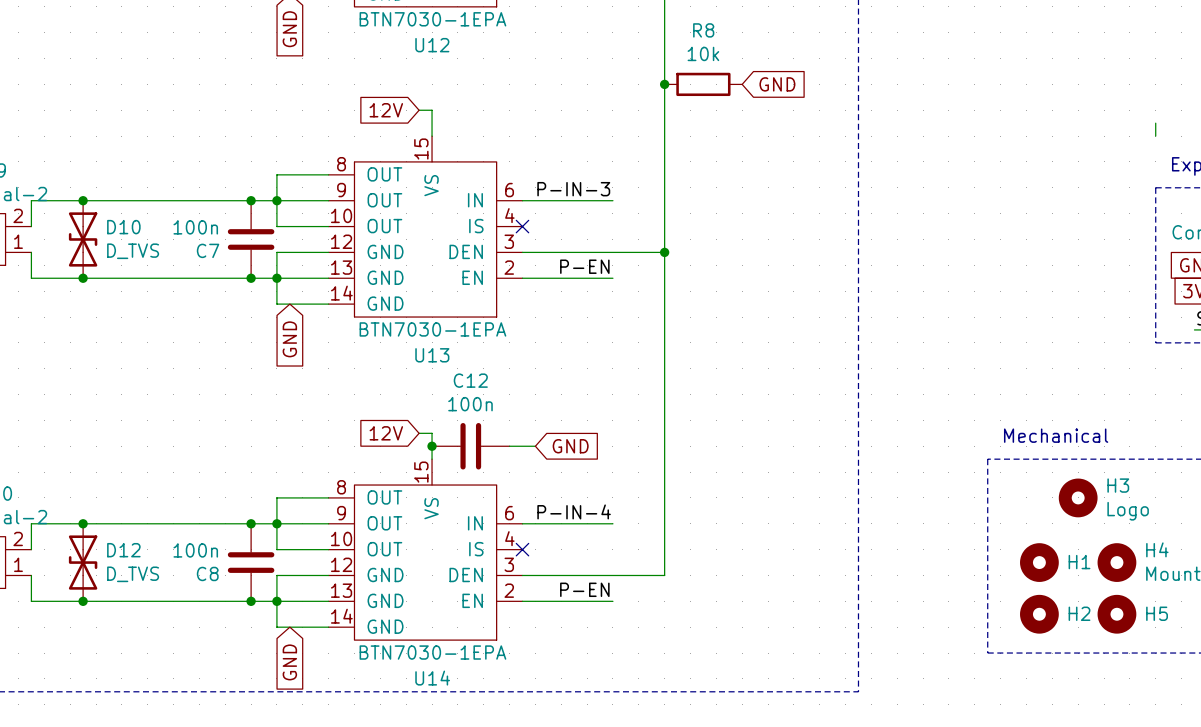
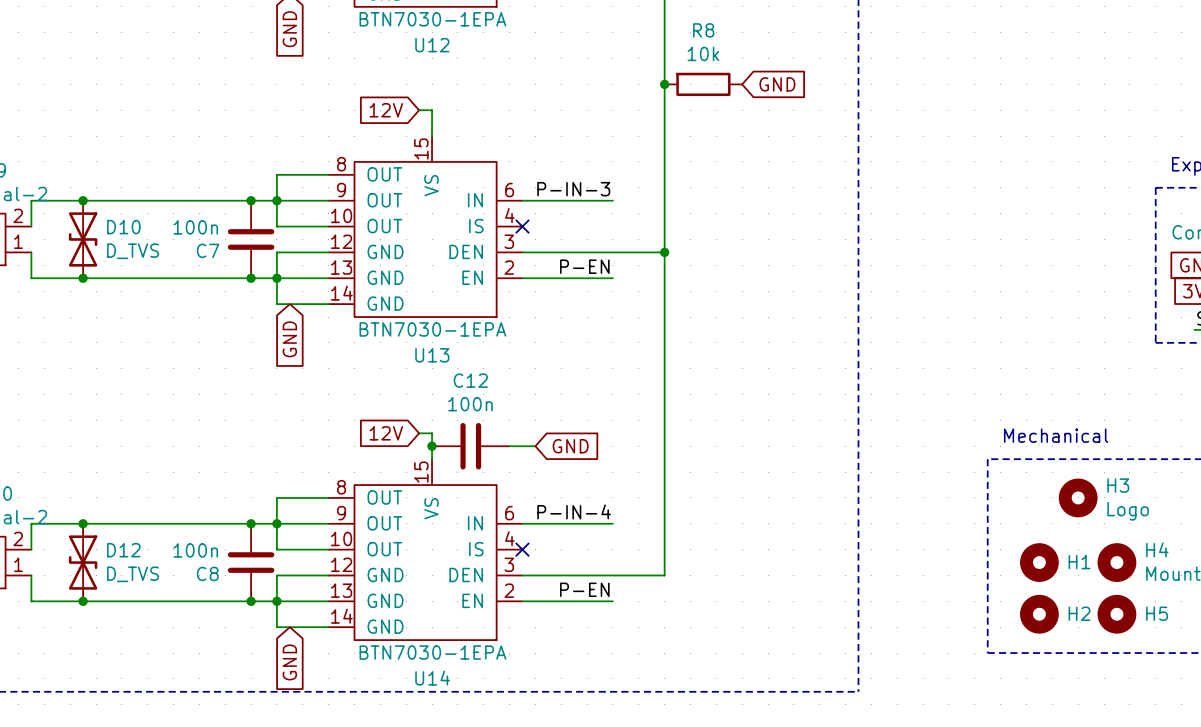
wire: (1155, 123) (1155, 136) -> none

